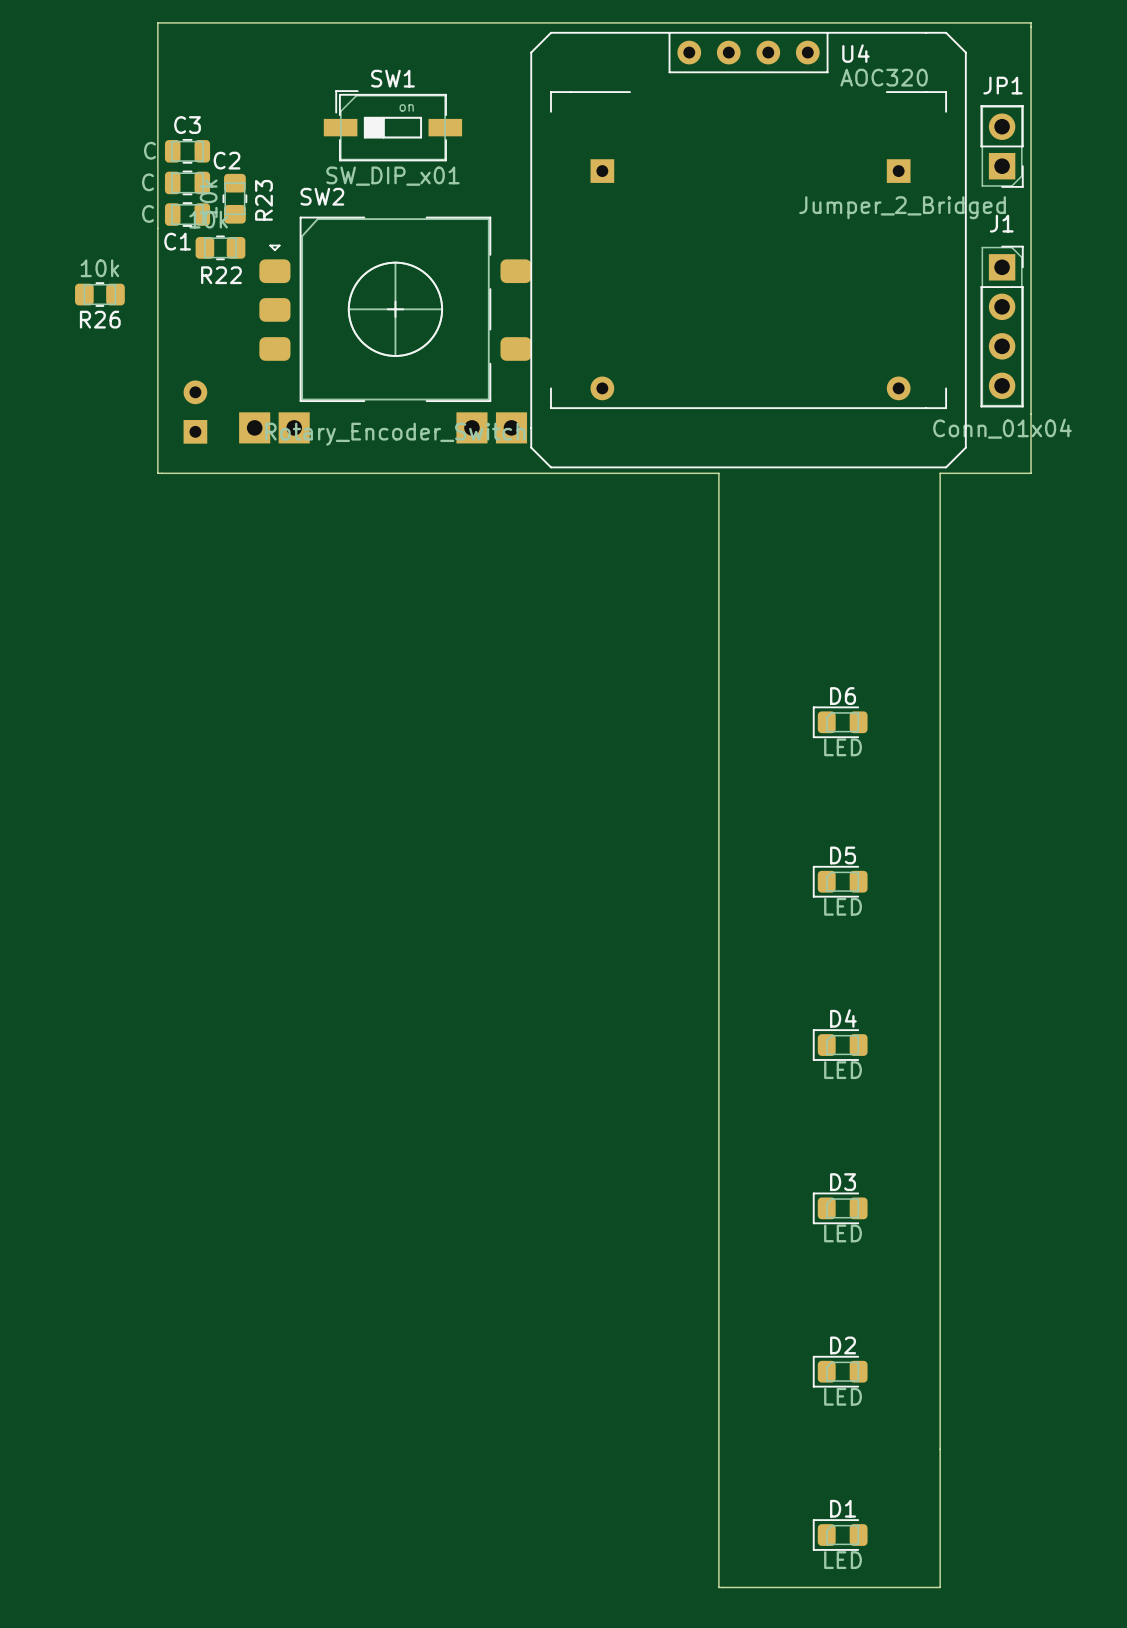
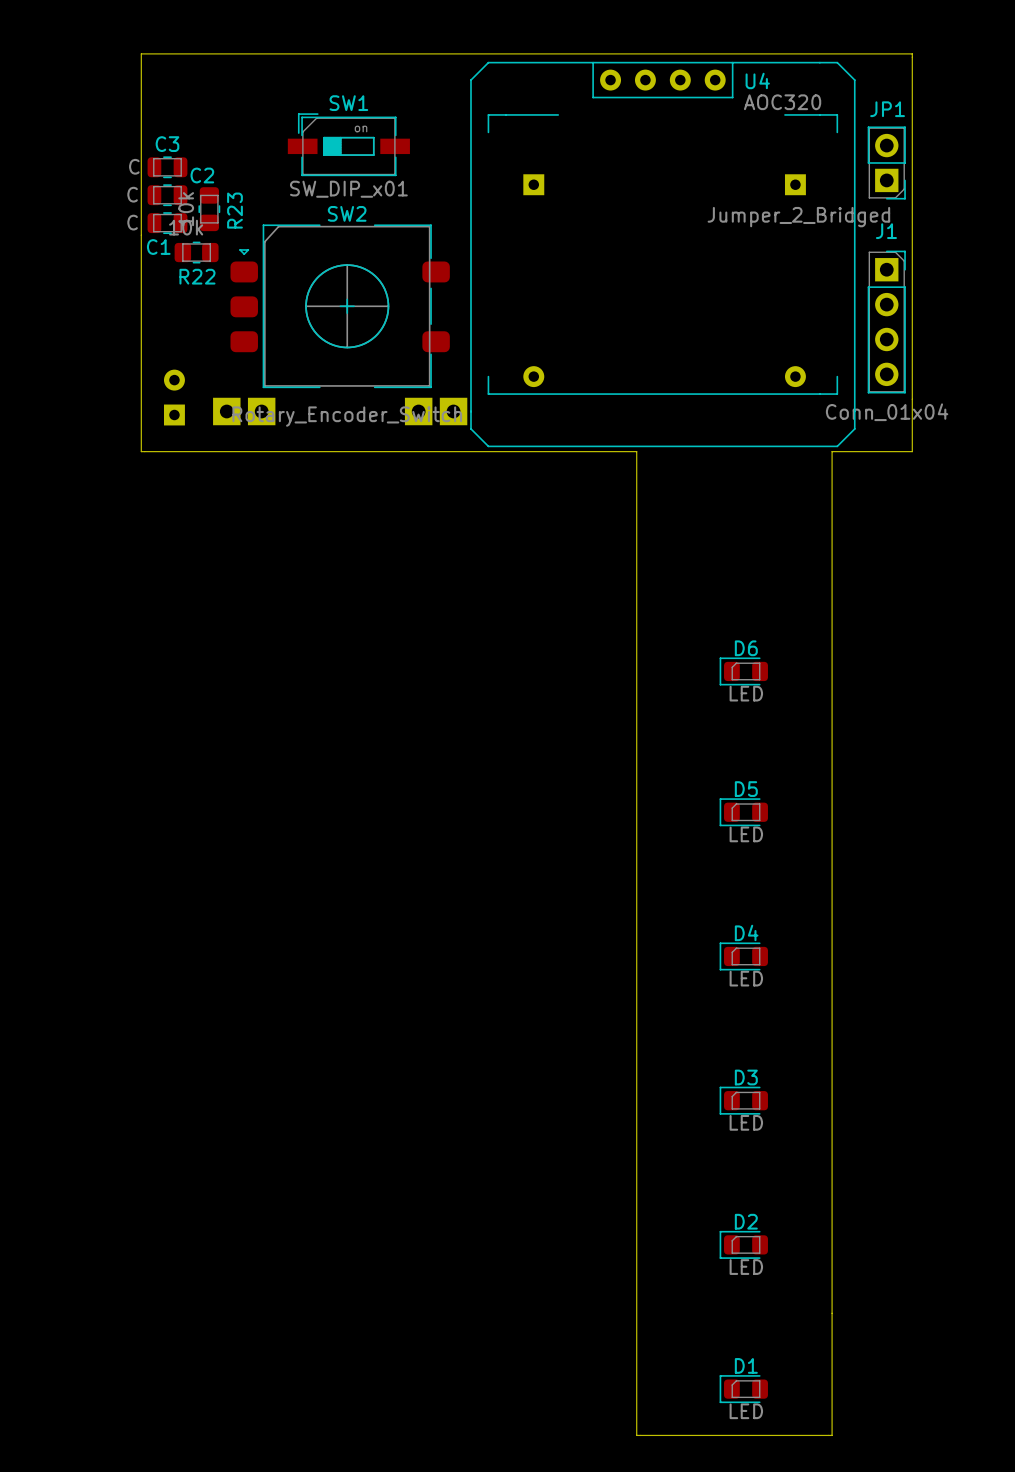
SW2 name position: SW2 (322, 196) -> SW2 (347, 213)
SW2 footprint: [259, 216, 532, 403] -> [230, 224, 450, 389]
R26: 10k (99, 294) -> none

